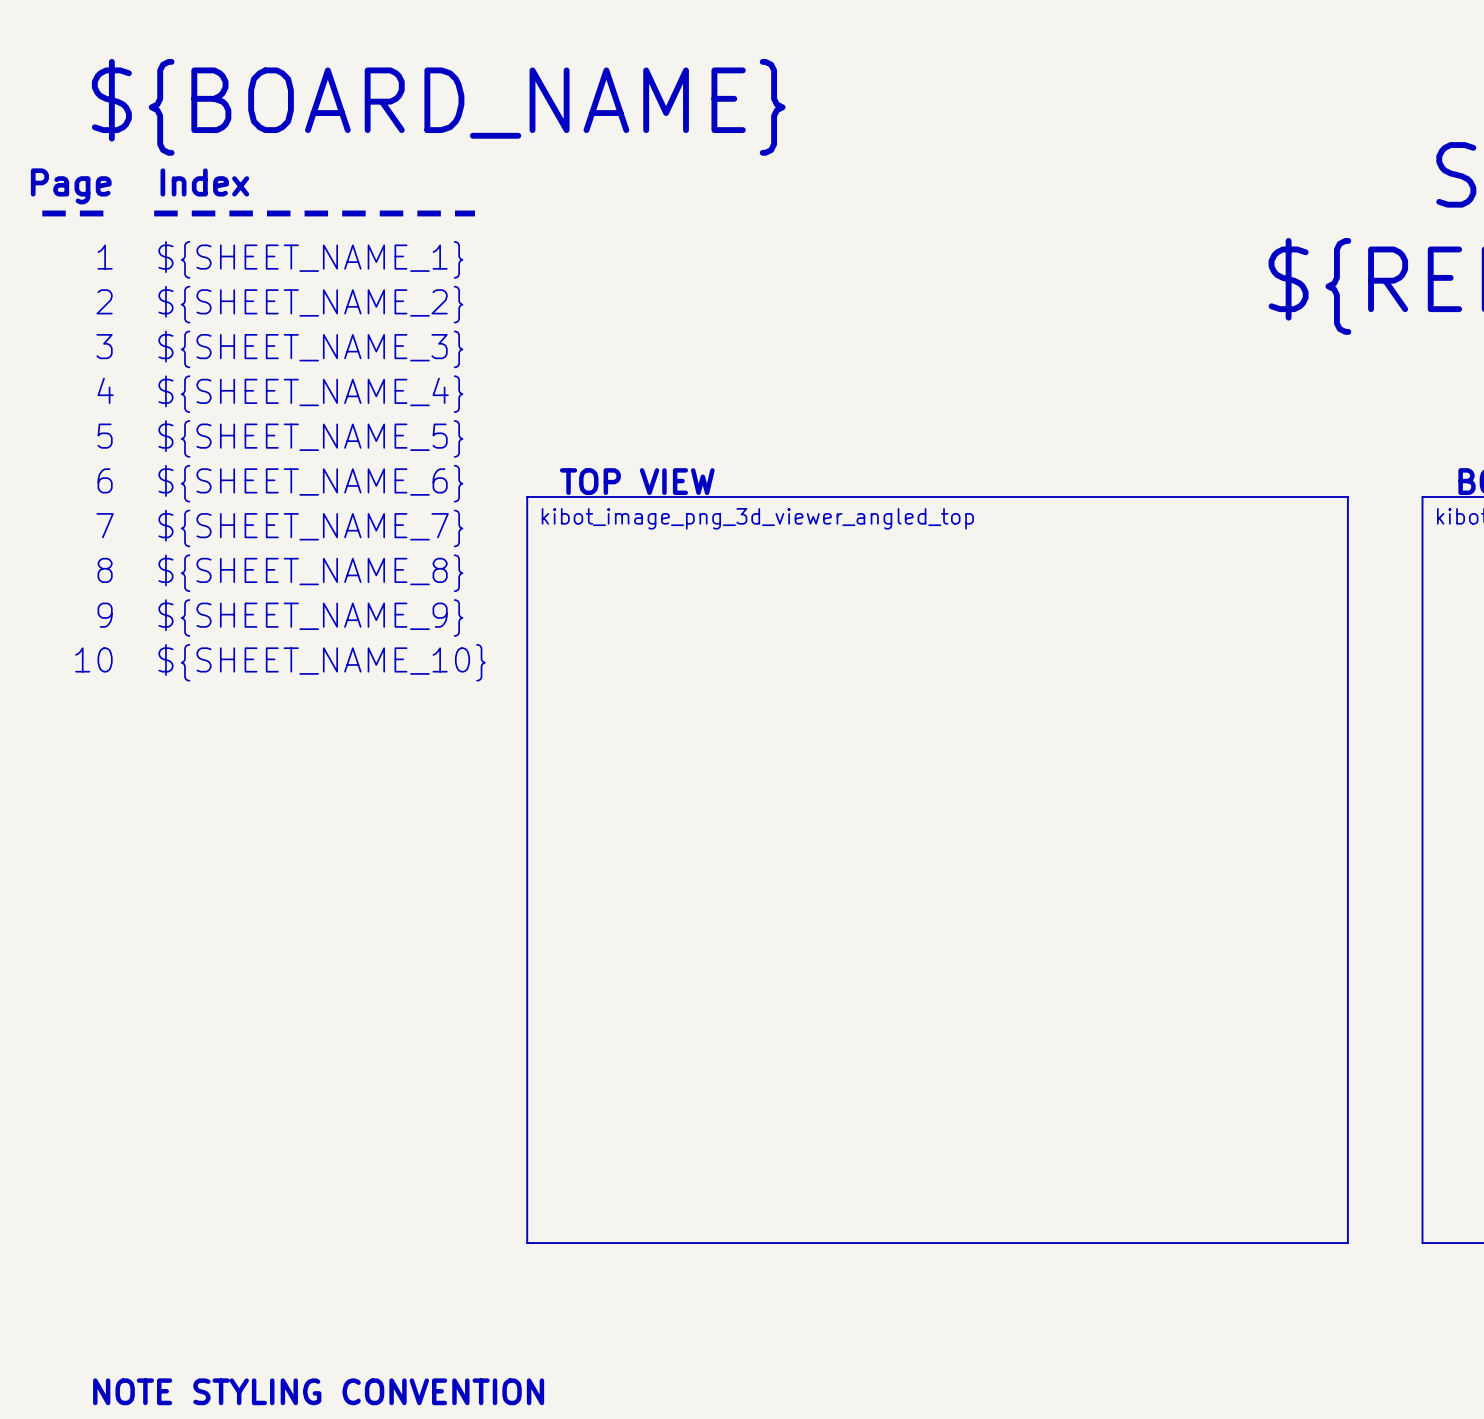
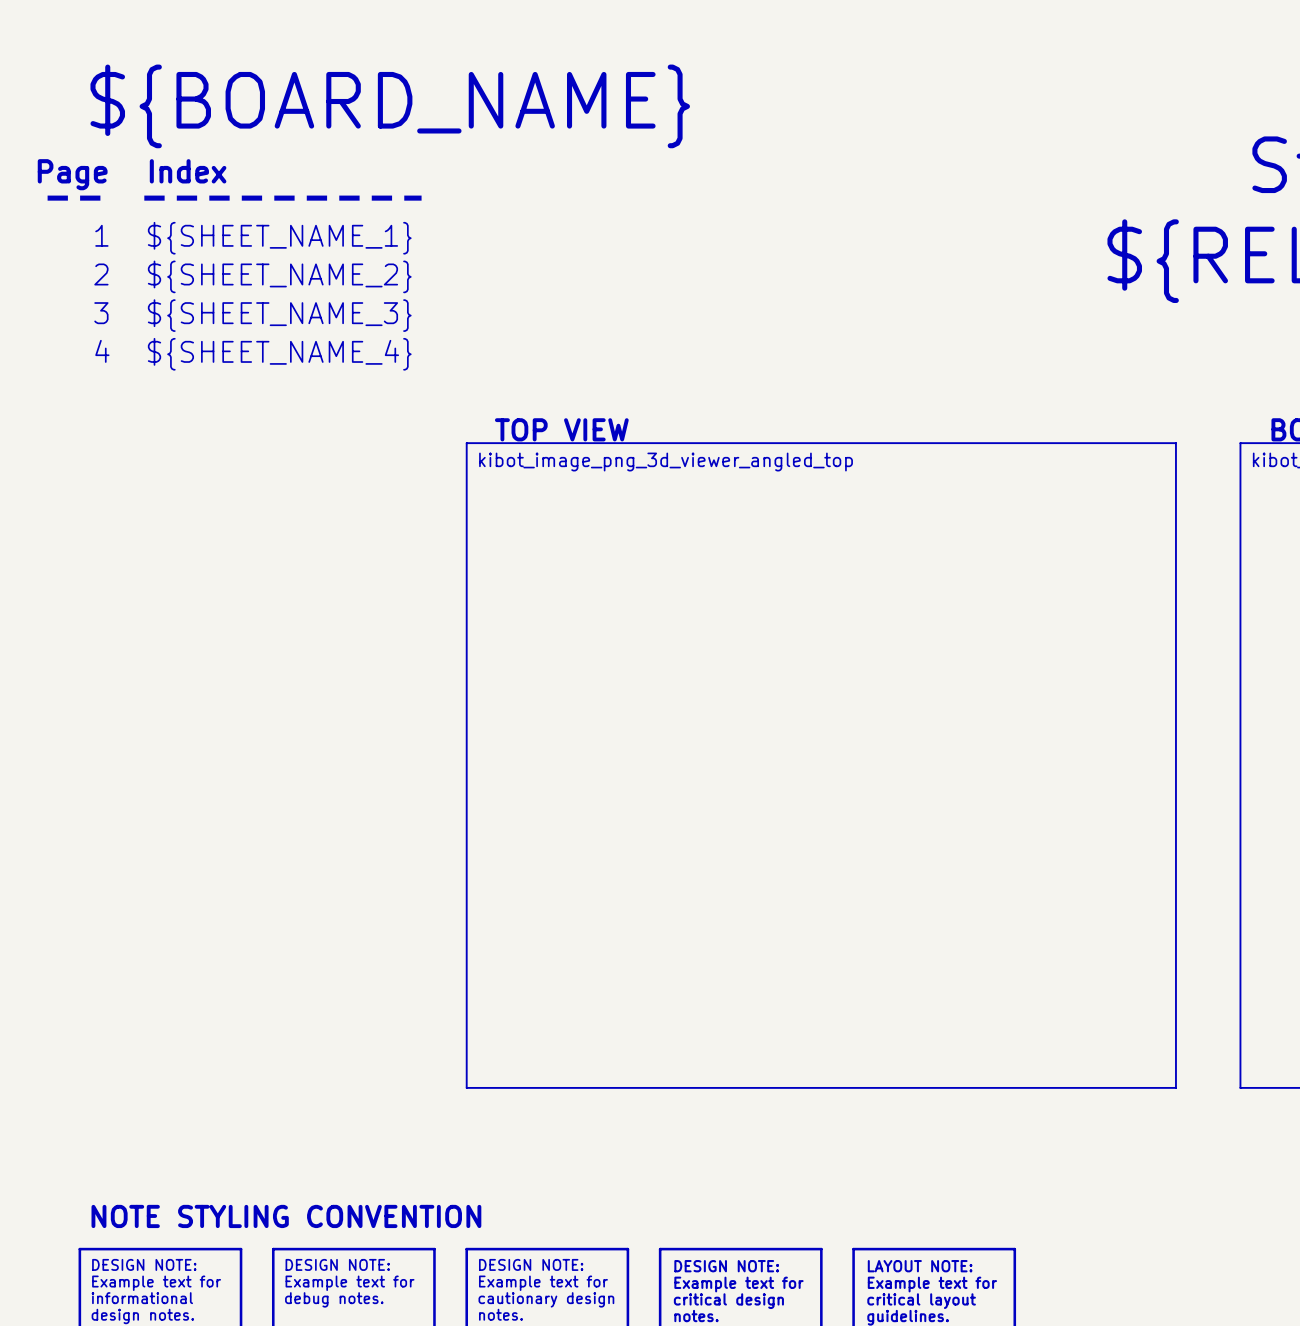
text: 5 (105, 436) -> none
text: ${SHEET_NAME_5} (310, 438) -> none
text: 6 (105, 480) -> none
text: ${SHEET_NAME_6} (310, 483) -> none
text: 7 (105, 525) -> none
text: ${SHEET_NAME_7} (310, 528) -> none
text: 8 (105, 570) -> none
text: ${SHEET_NAME_8} (310, 573) -> none
text: 9 (105, 615) -> none
text: ${SHEET_NAME_9} (310, 617) -> none
text: 10 (93, 659) -> none
text: ${SHEET_NAME_10} (322, 662) -> none

